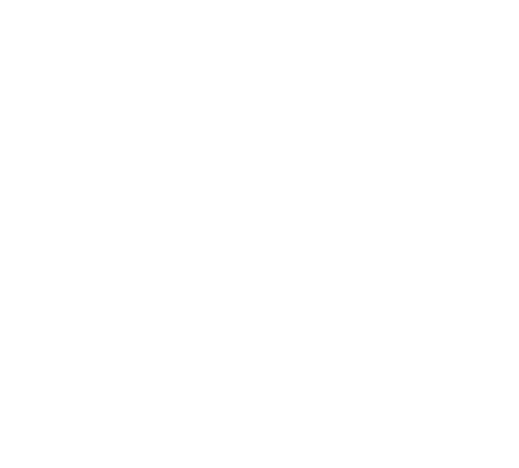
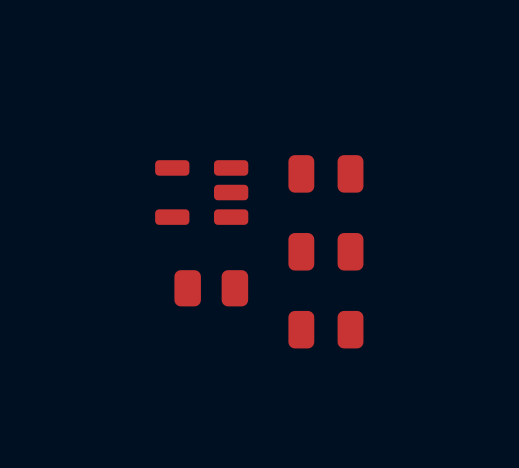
part: none -> (325, 173)
part: none -> (201, 192)
part: none -> (325, 251)
part: none -> (211, 288)
part: none -> (325, 329)

